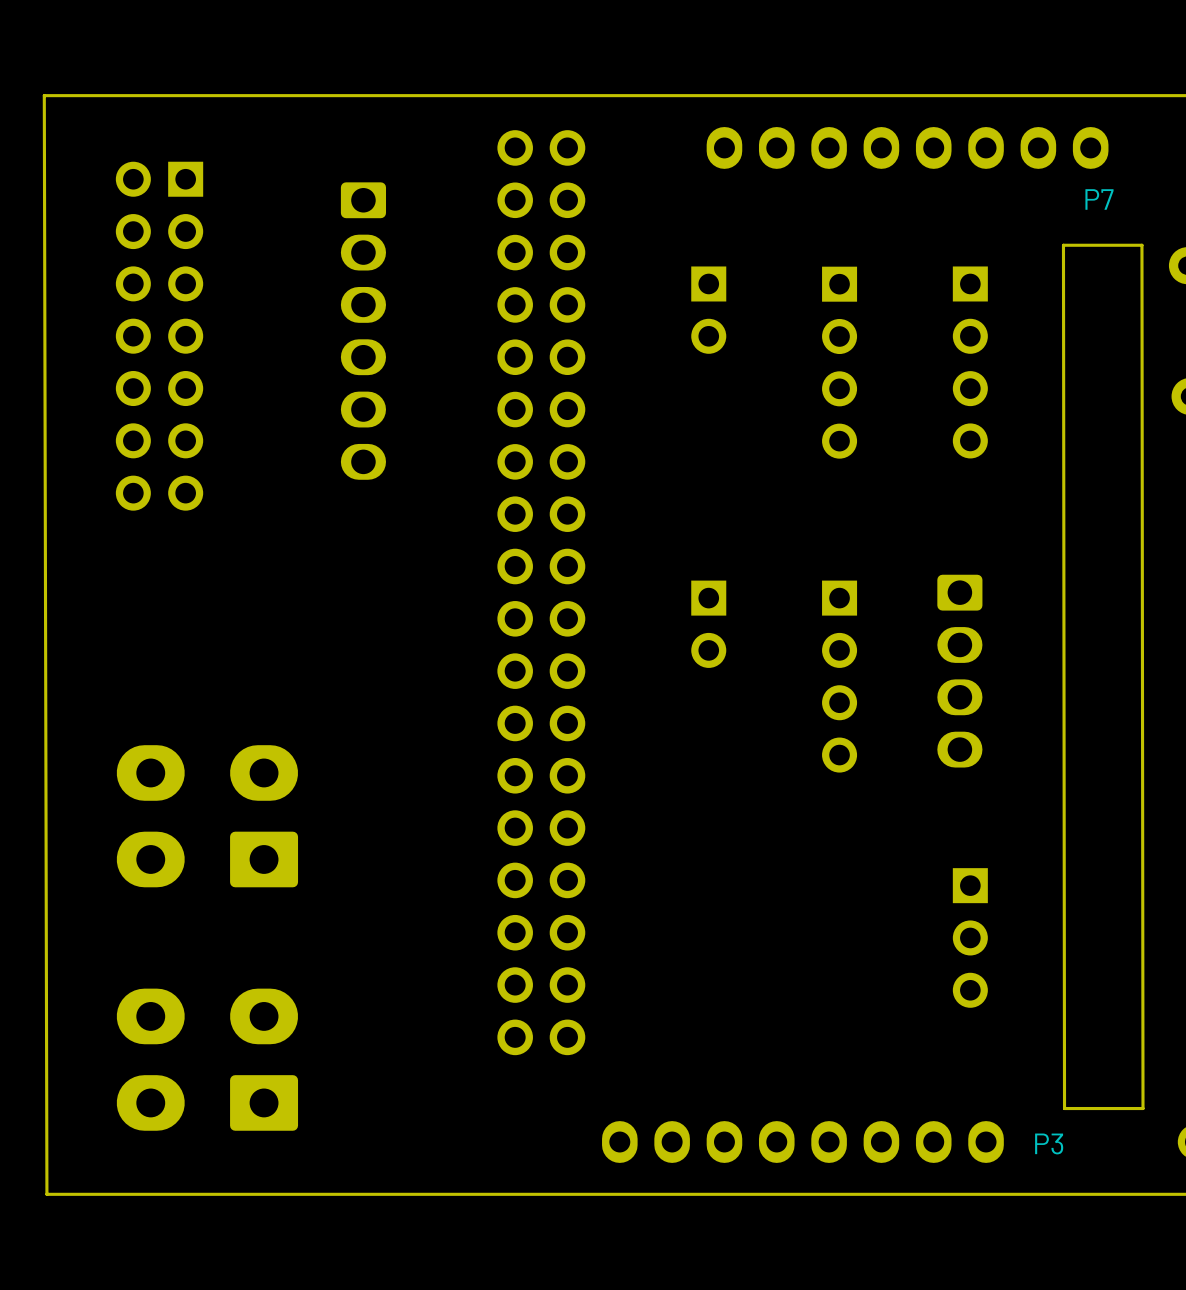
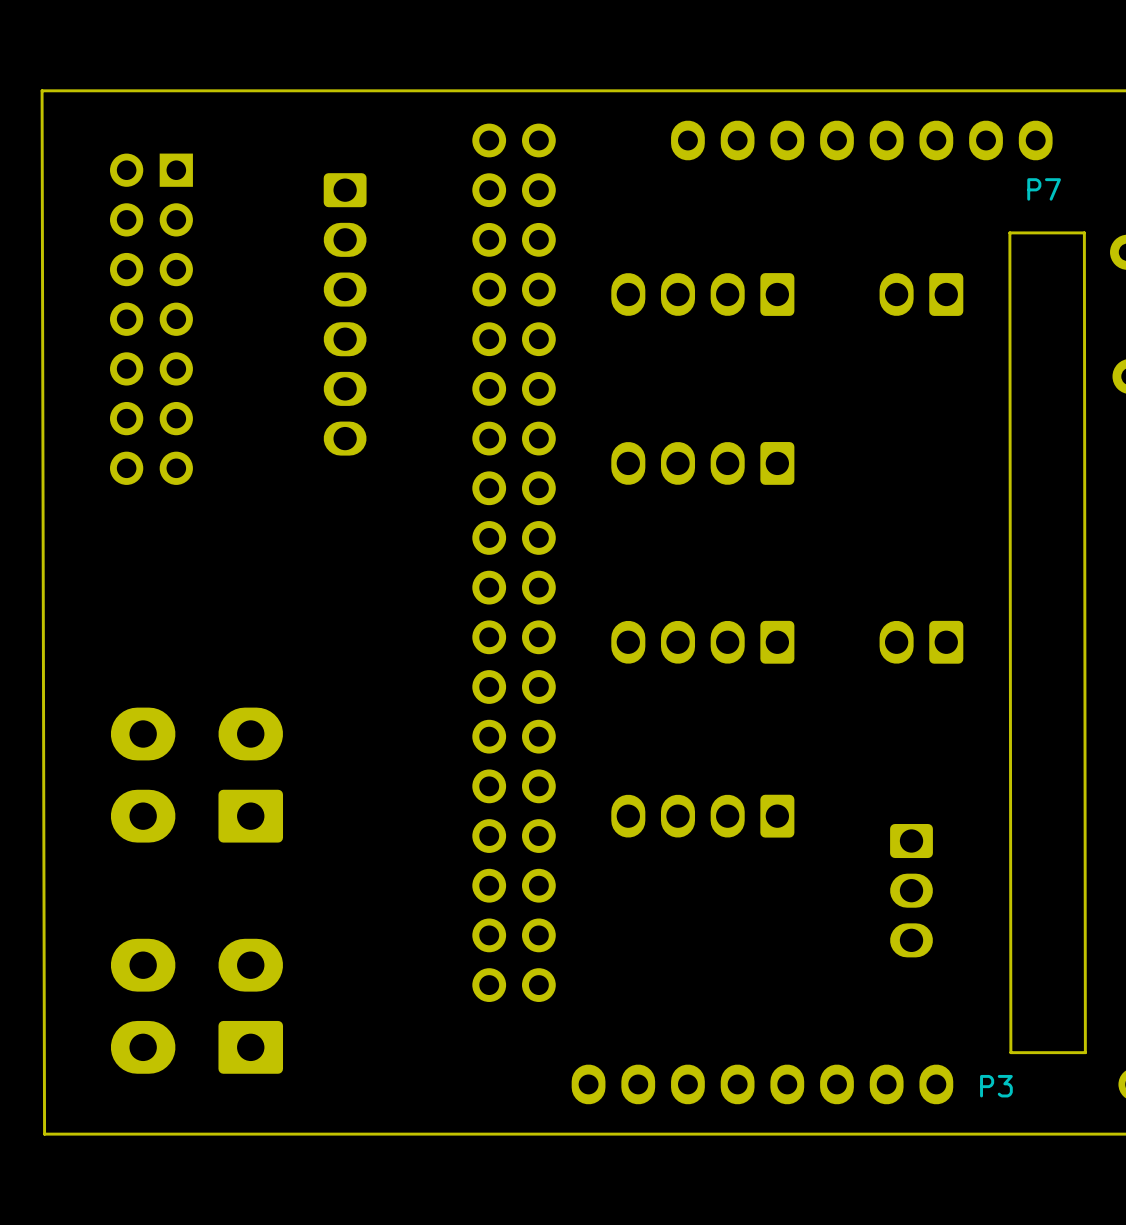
part: (708, 310) -> none
part: none -> (702, 294)
part: none -> (921, 294)
part: (839, 362) -> none
part: (970, 362) -> none
part: none -> (702, 463)
part footprint: [937, 574, 983, 768] -> [879, 620, 964, 664]
part: (708, 624) -> none
part: none -> (702, 642)
part: (839, 676) -> none
part: none -> (702, 816)
part footprint: [952, 868, 988, 1008] -> [890, 823, 933, 958]

